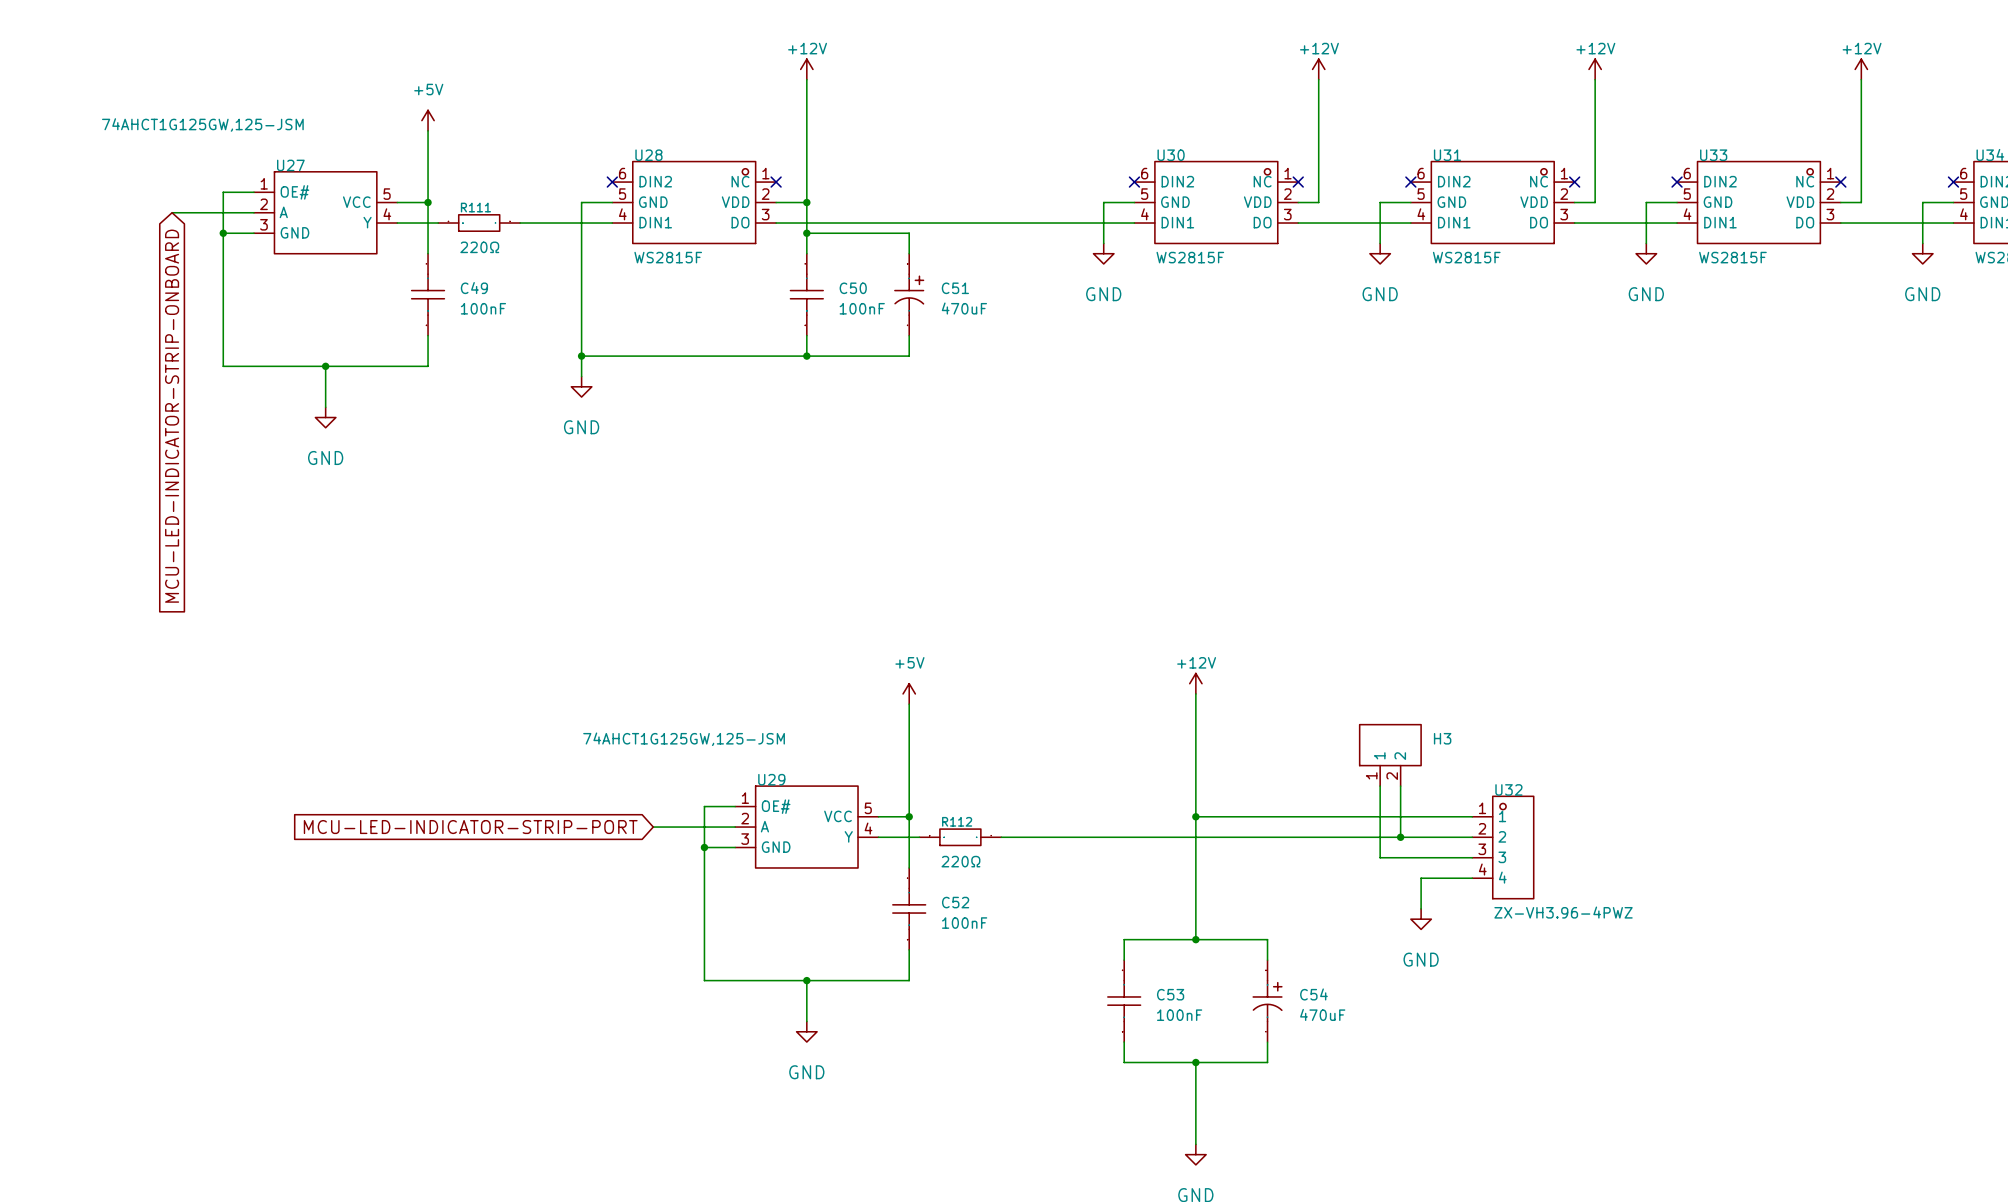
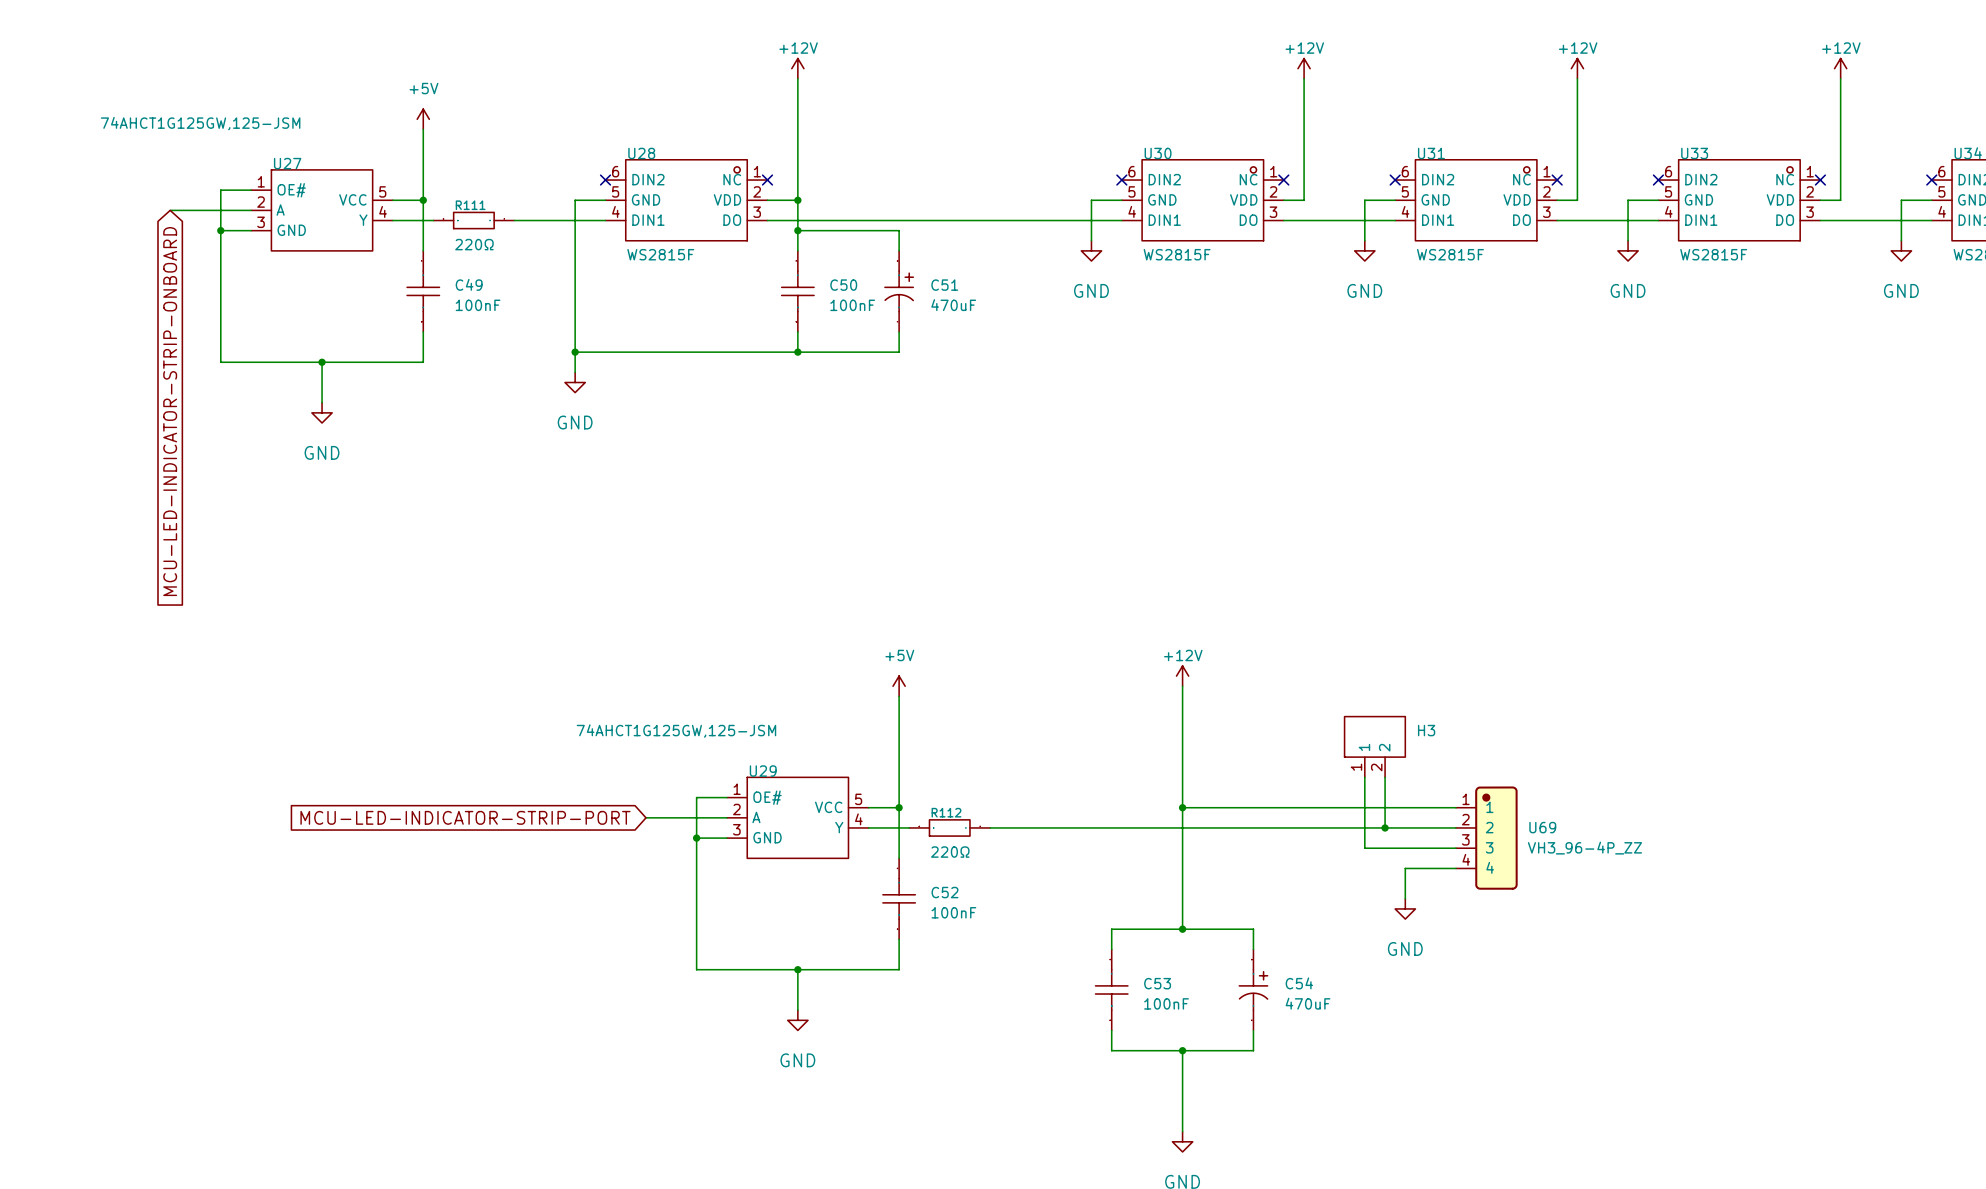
U32: ZX-VH3.96-4PWZ (1503, 847) -> none
U69: none -> VH3_96-4P_ZZ (1486, 838)

